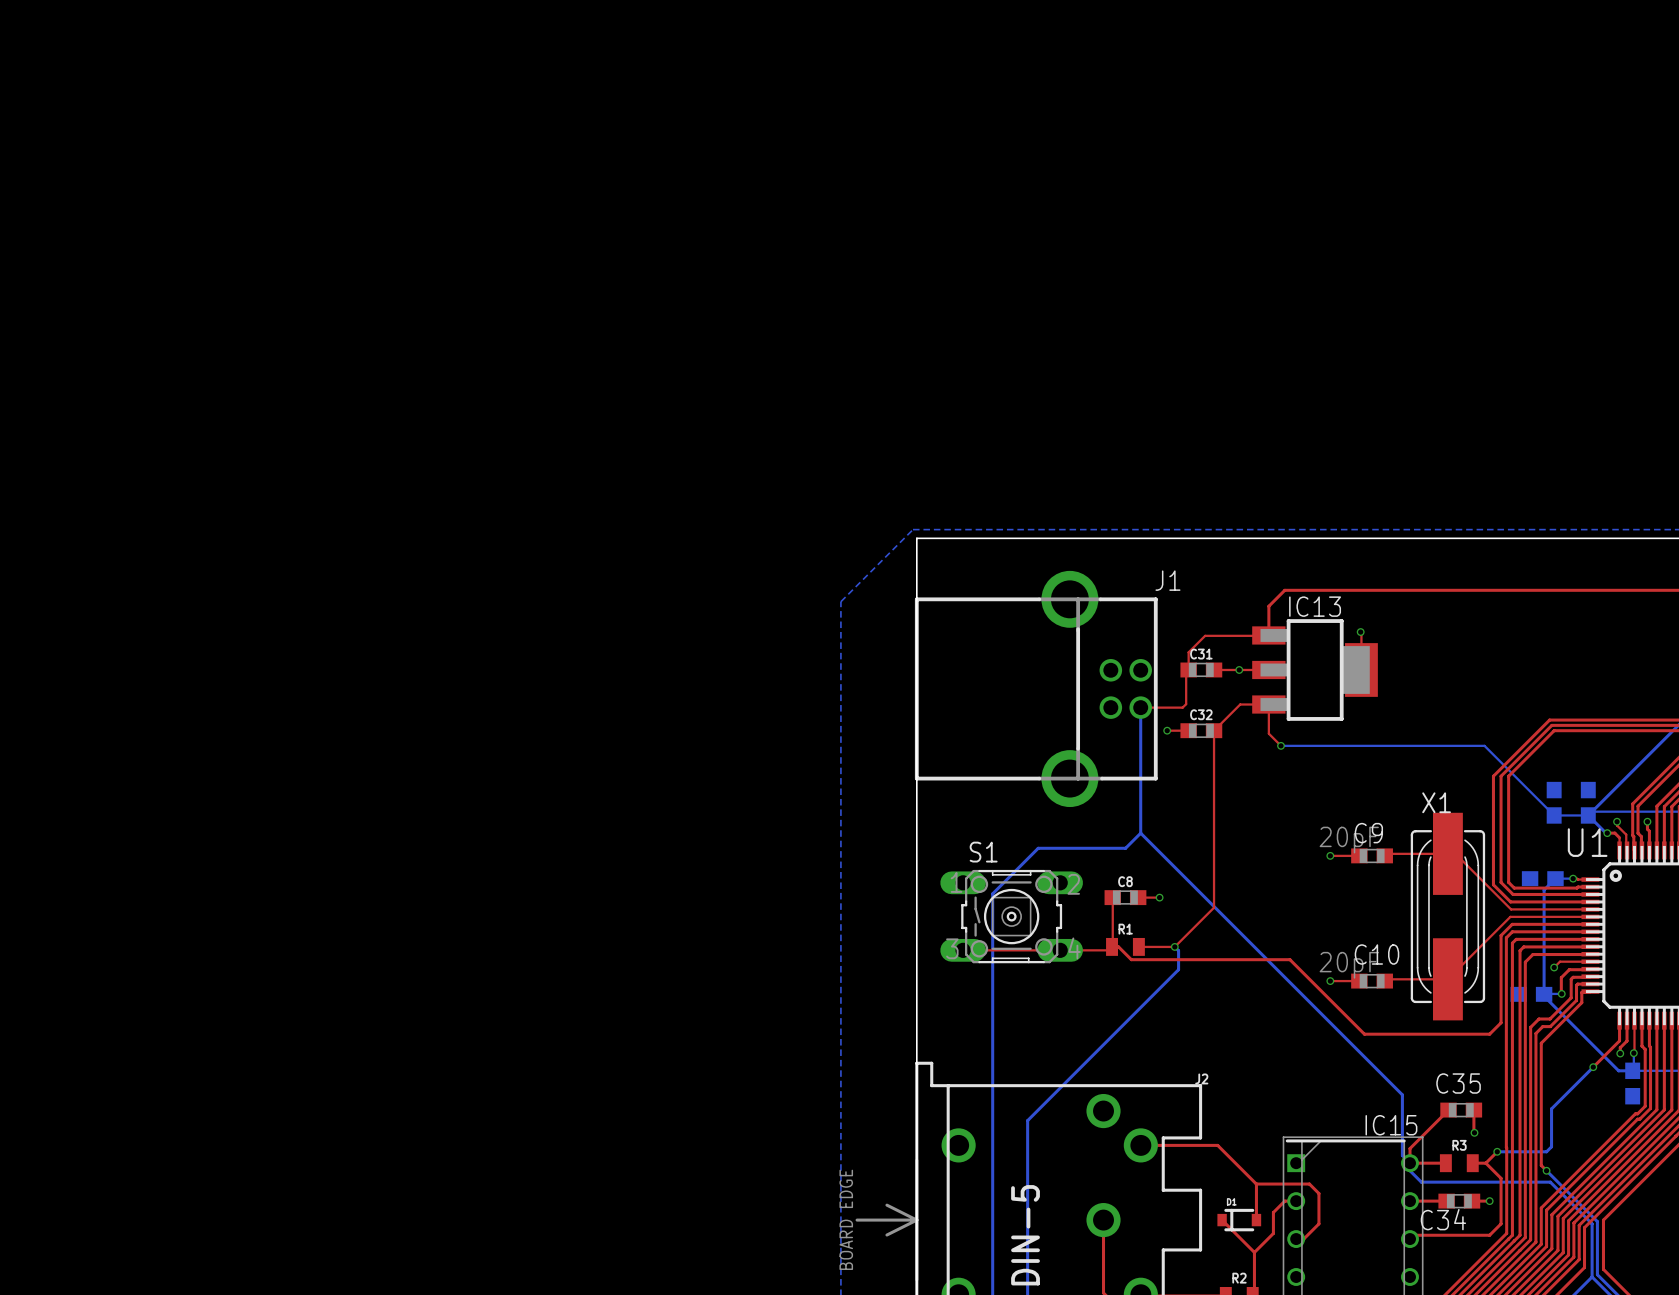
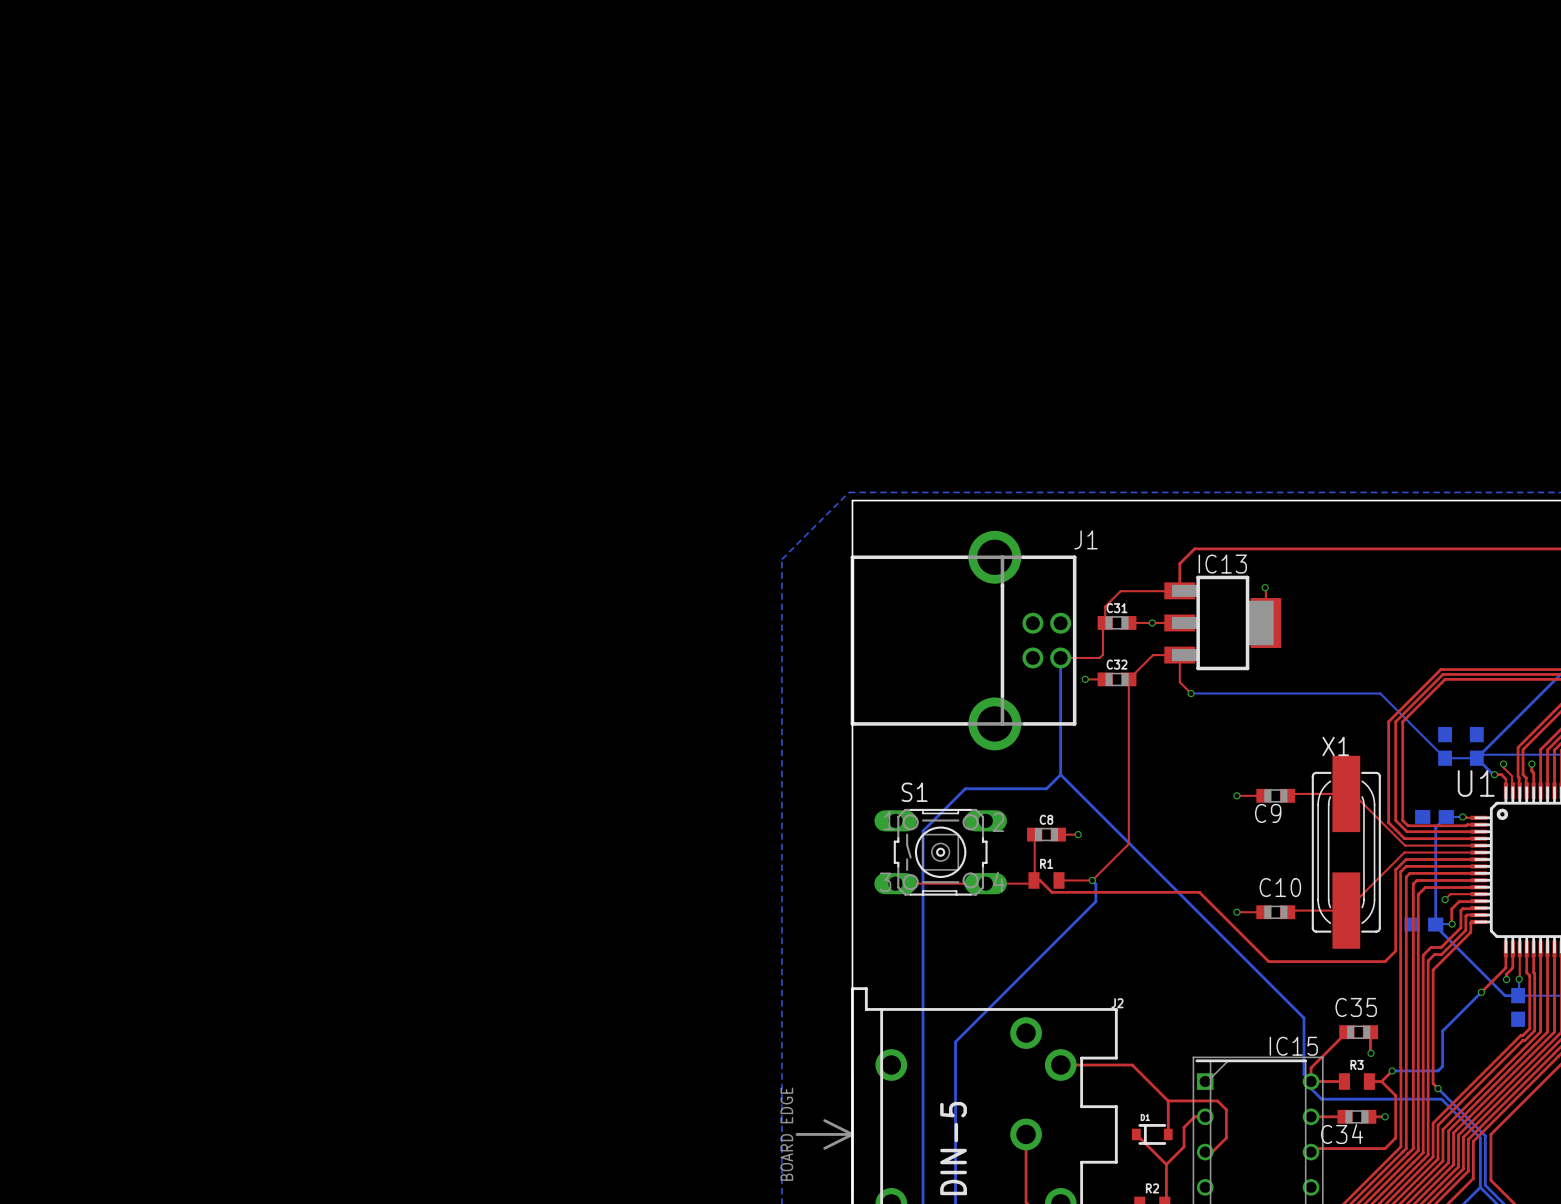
C9 name position: C9 (1368, 833) -> C9 (1268, 813)
C9 value: 20pF (1349, 840) -> none
C10 value: 20pF (1349, 965) -> none

